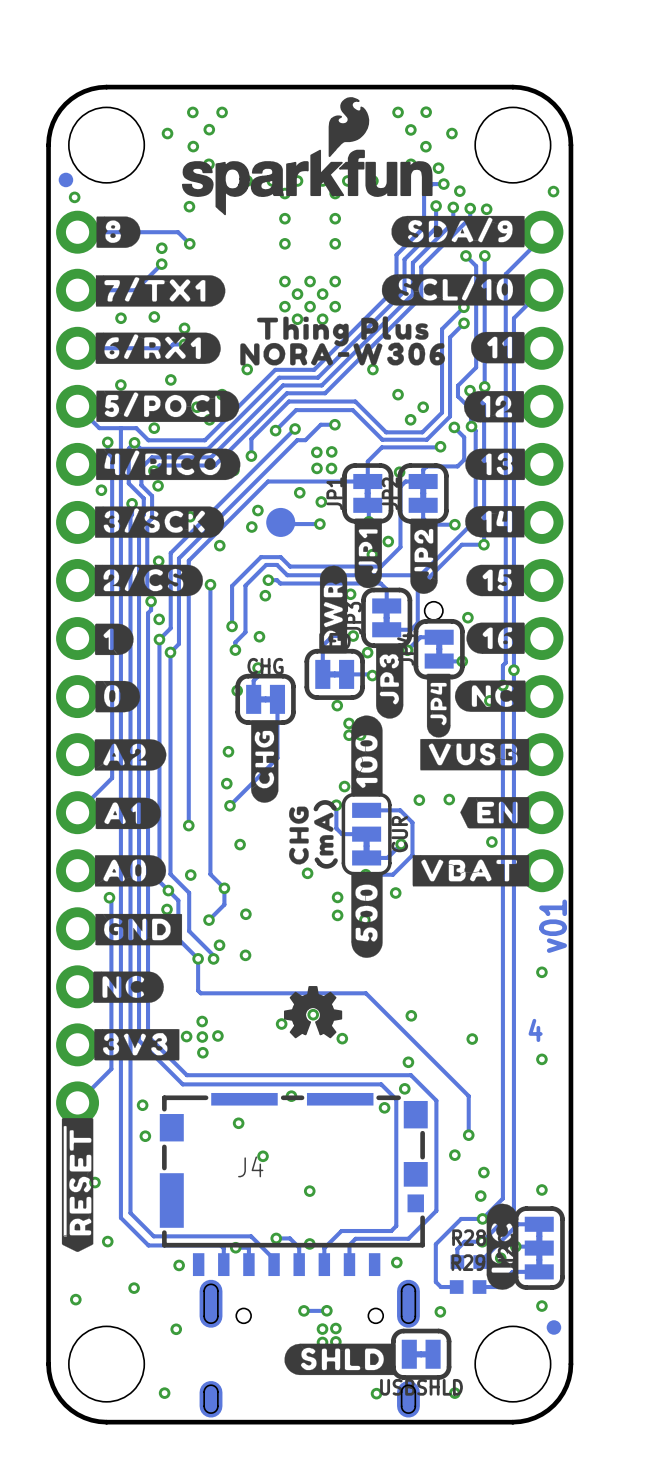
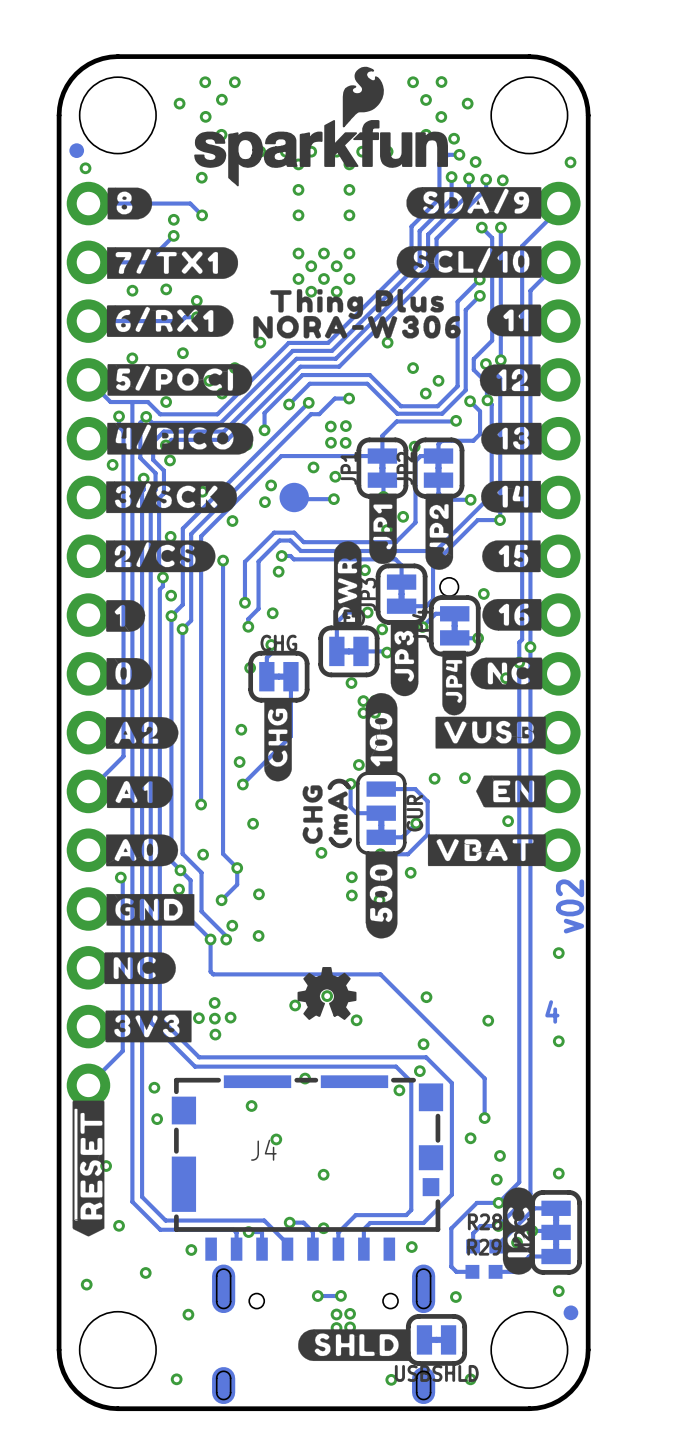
text: v01 (553, 926) -> v02 (570, 906)

